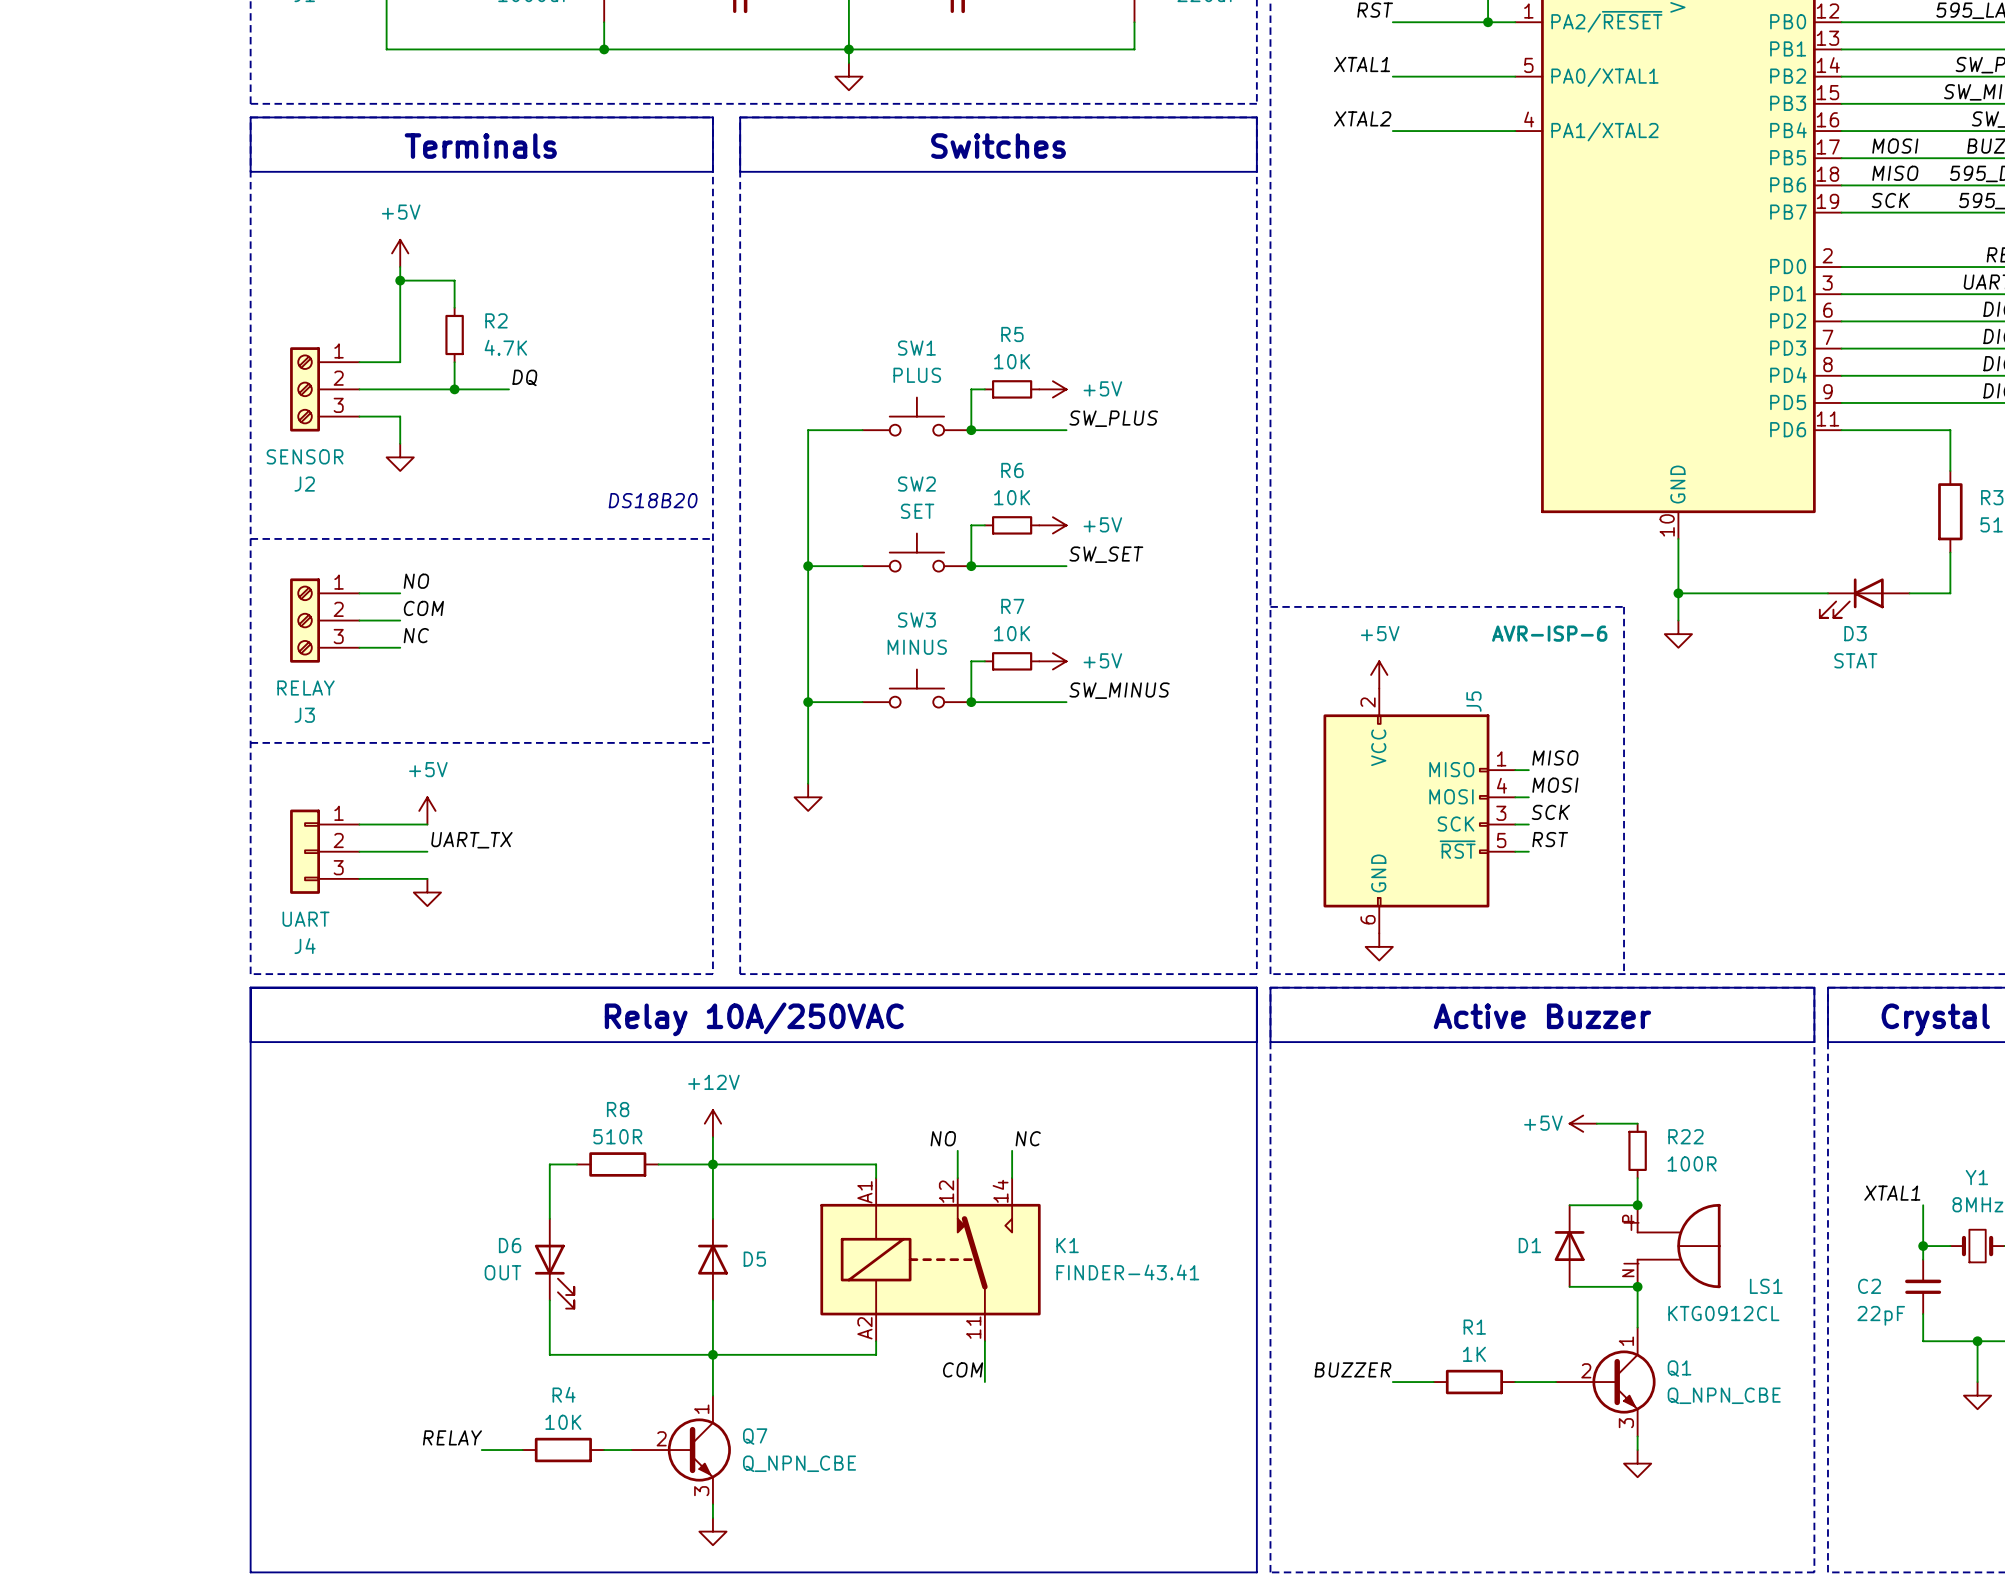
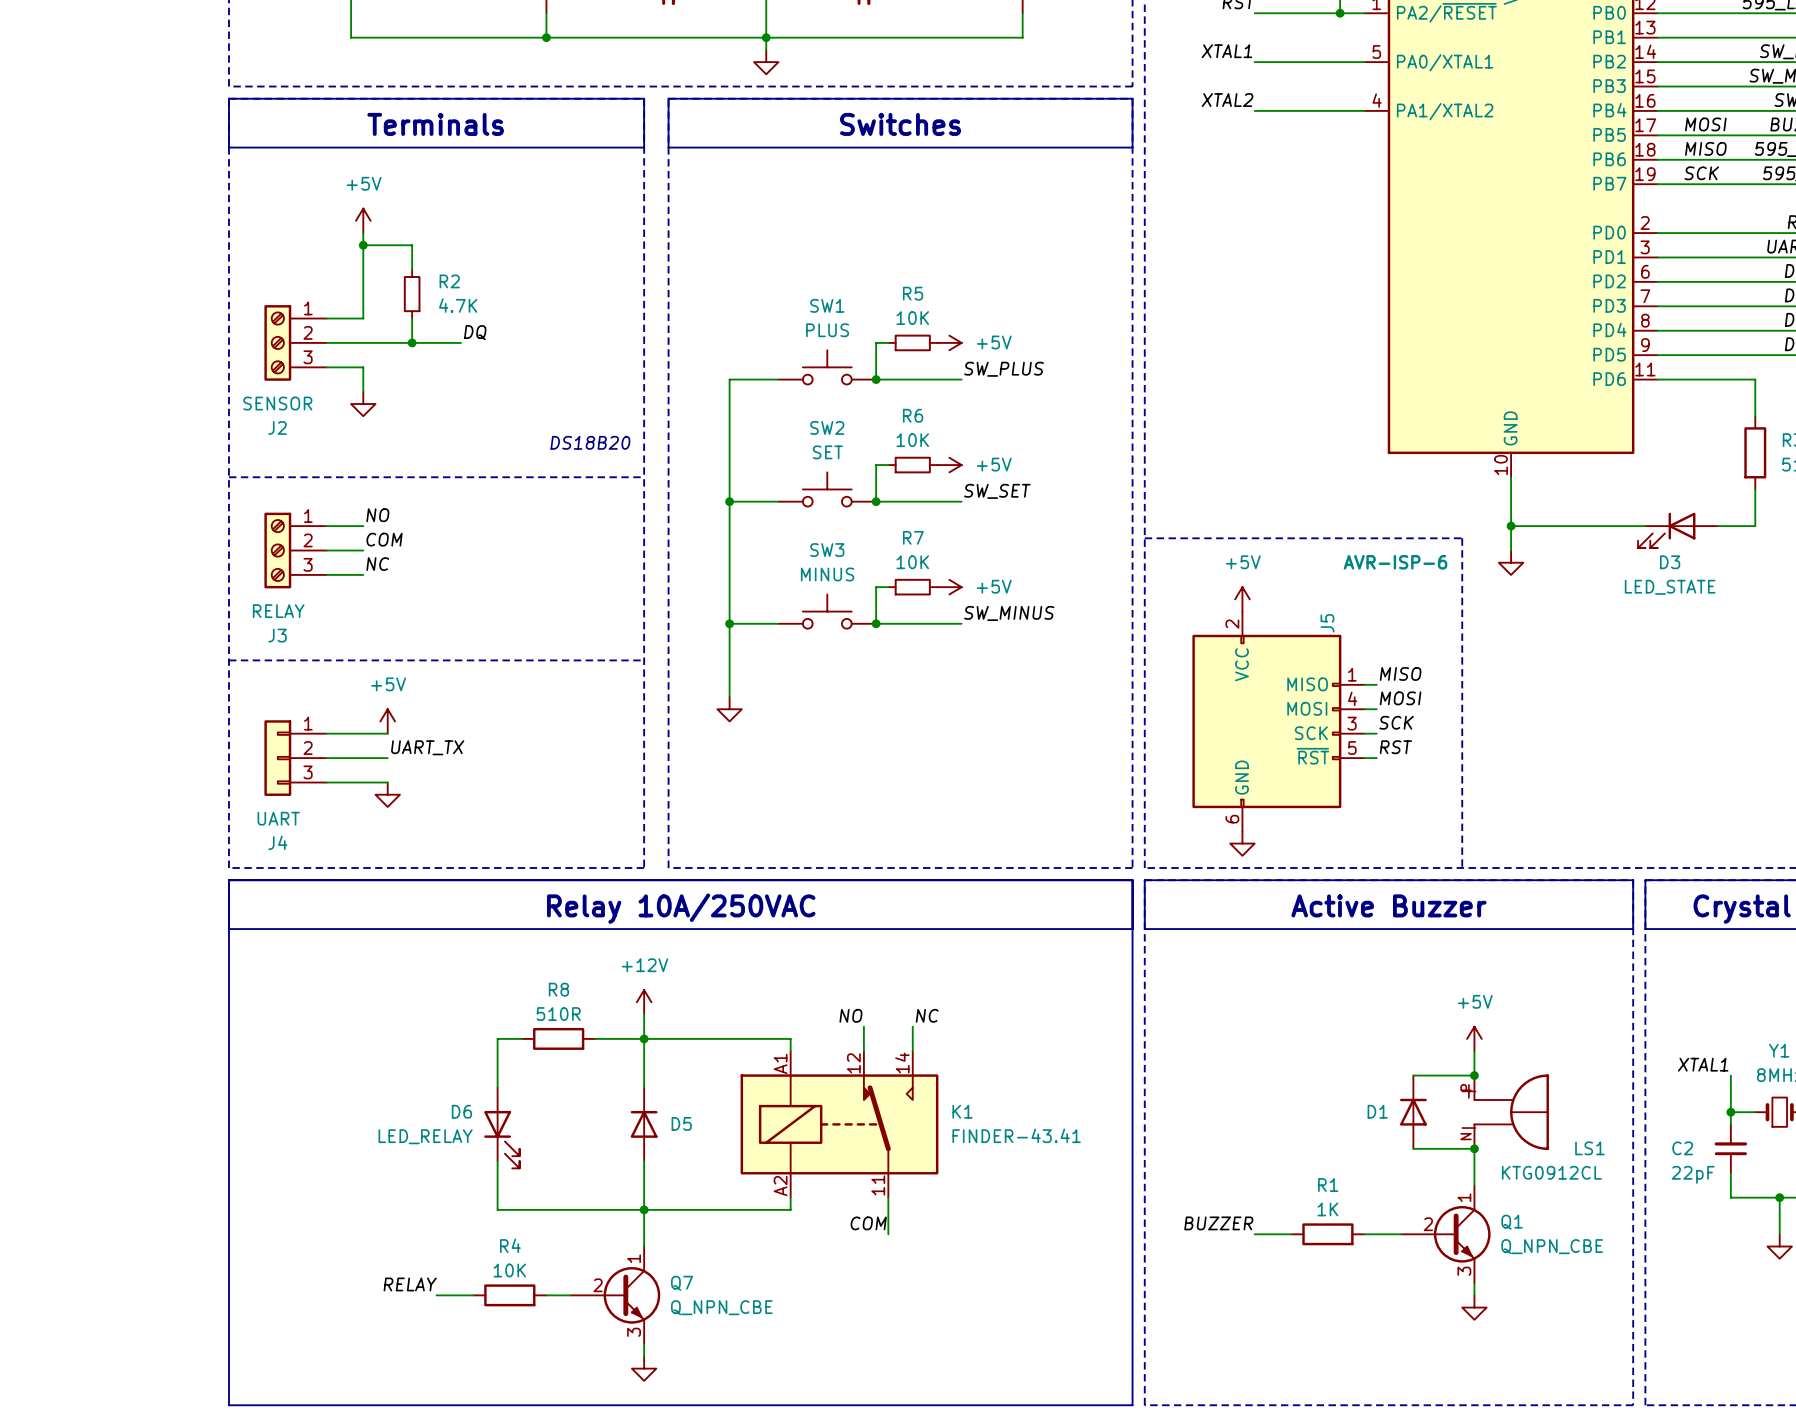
D3 value: STAT (1855, 660) -> LED_STATE (1670, 587)
power symbol rotation: 0° (1583, 1123) -> 90° clockwise (1474, 1038)
power symbol position: +5V (1583, 1123) -> +5V (1474, 1038)
wire: (1596, 1123) (1637, 1123) -> none
R22: 100R (1637, 1150) -> none
D6 value: OUT (502, 1272) -> LED_RELAY (425, 1136)

